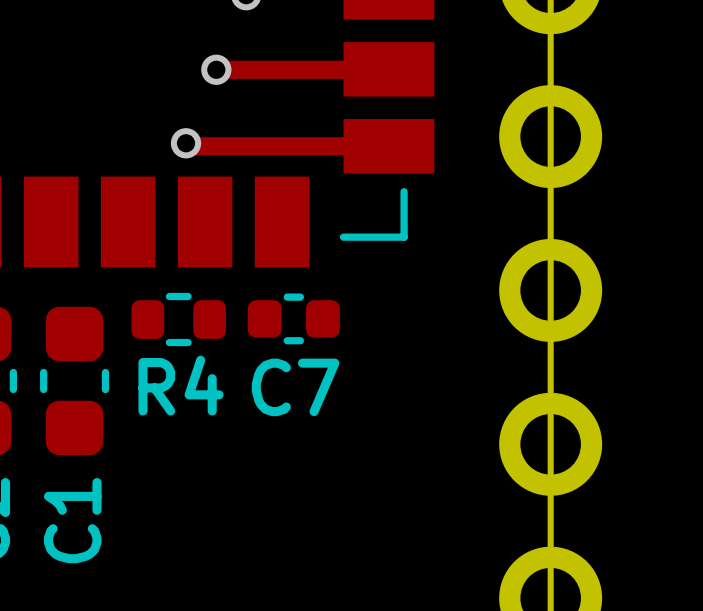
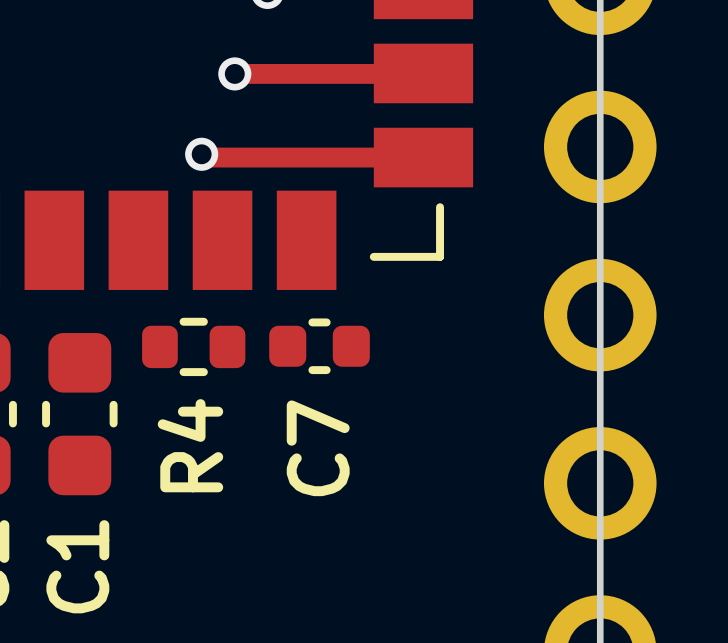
R4 name rotation: 0° (181, 385) -> 90° counterclockwise (190, 445)
C7 name rotation: 0° (295, 387) -> 90° counterclockwise (318, 448)

